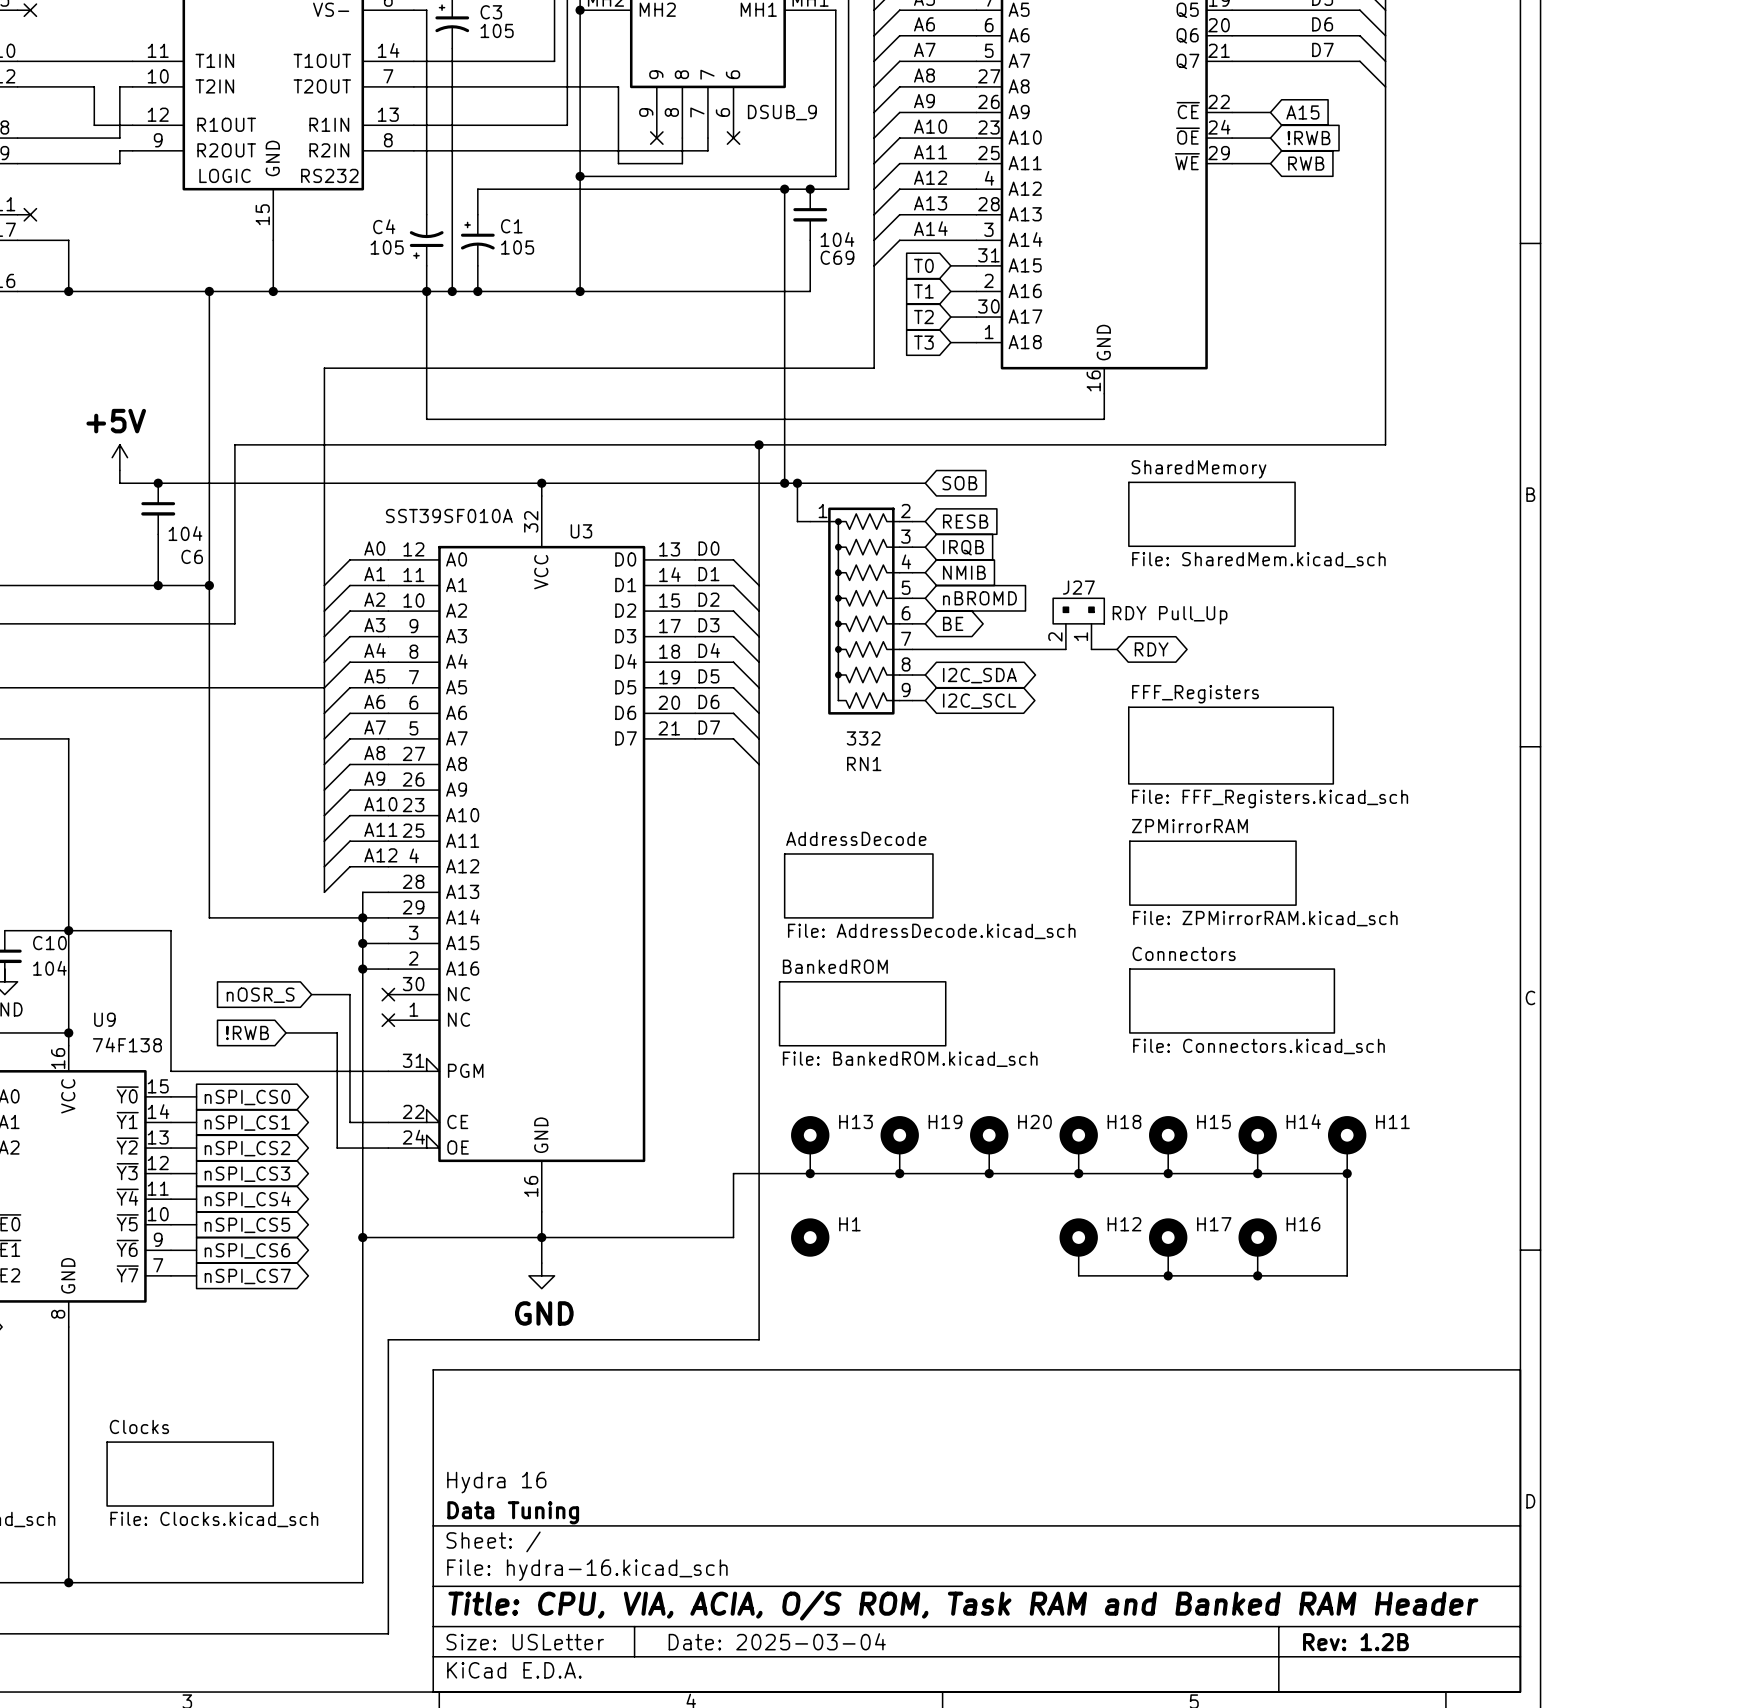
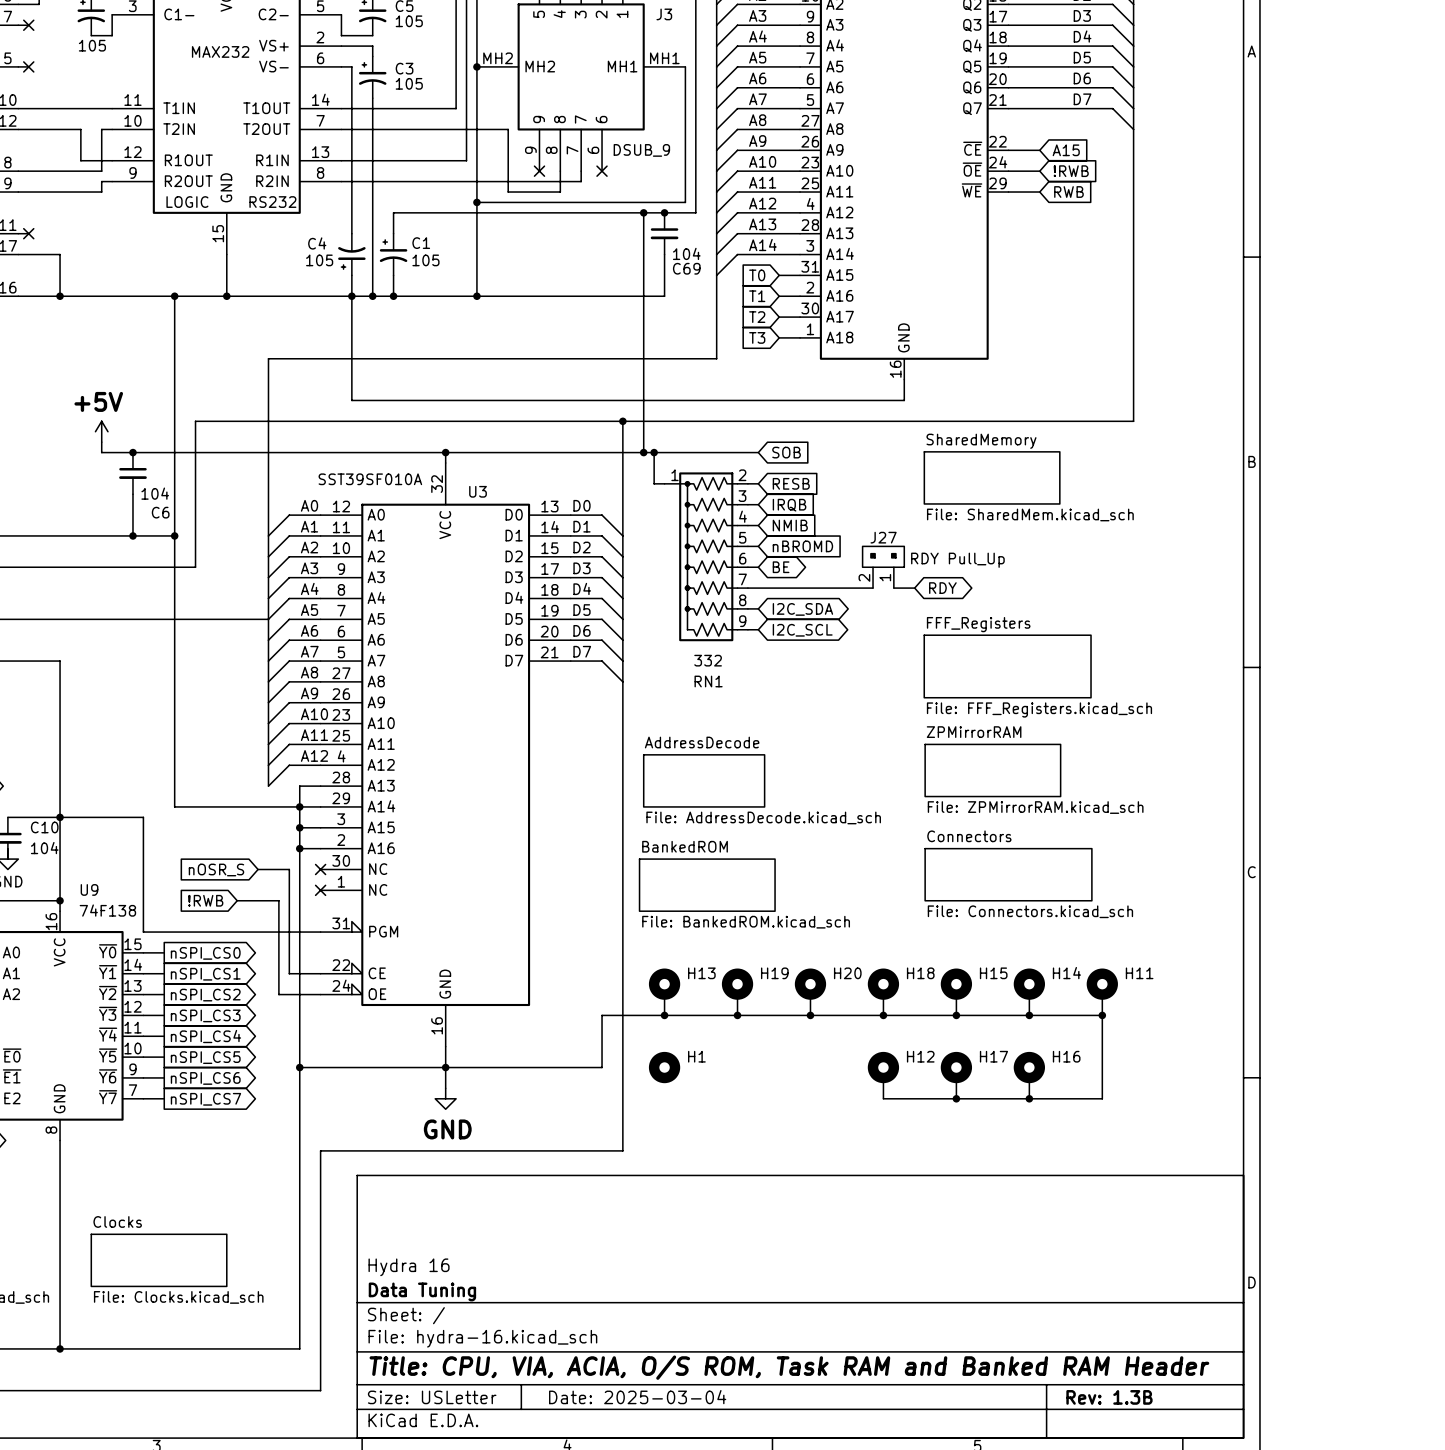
title block: Rev: 1.2B (1355, 1642) -> Rev: 1.3B (1109, 1397)

